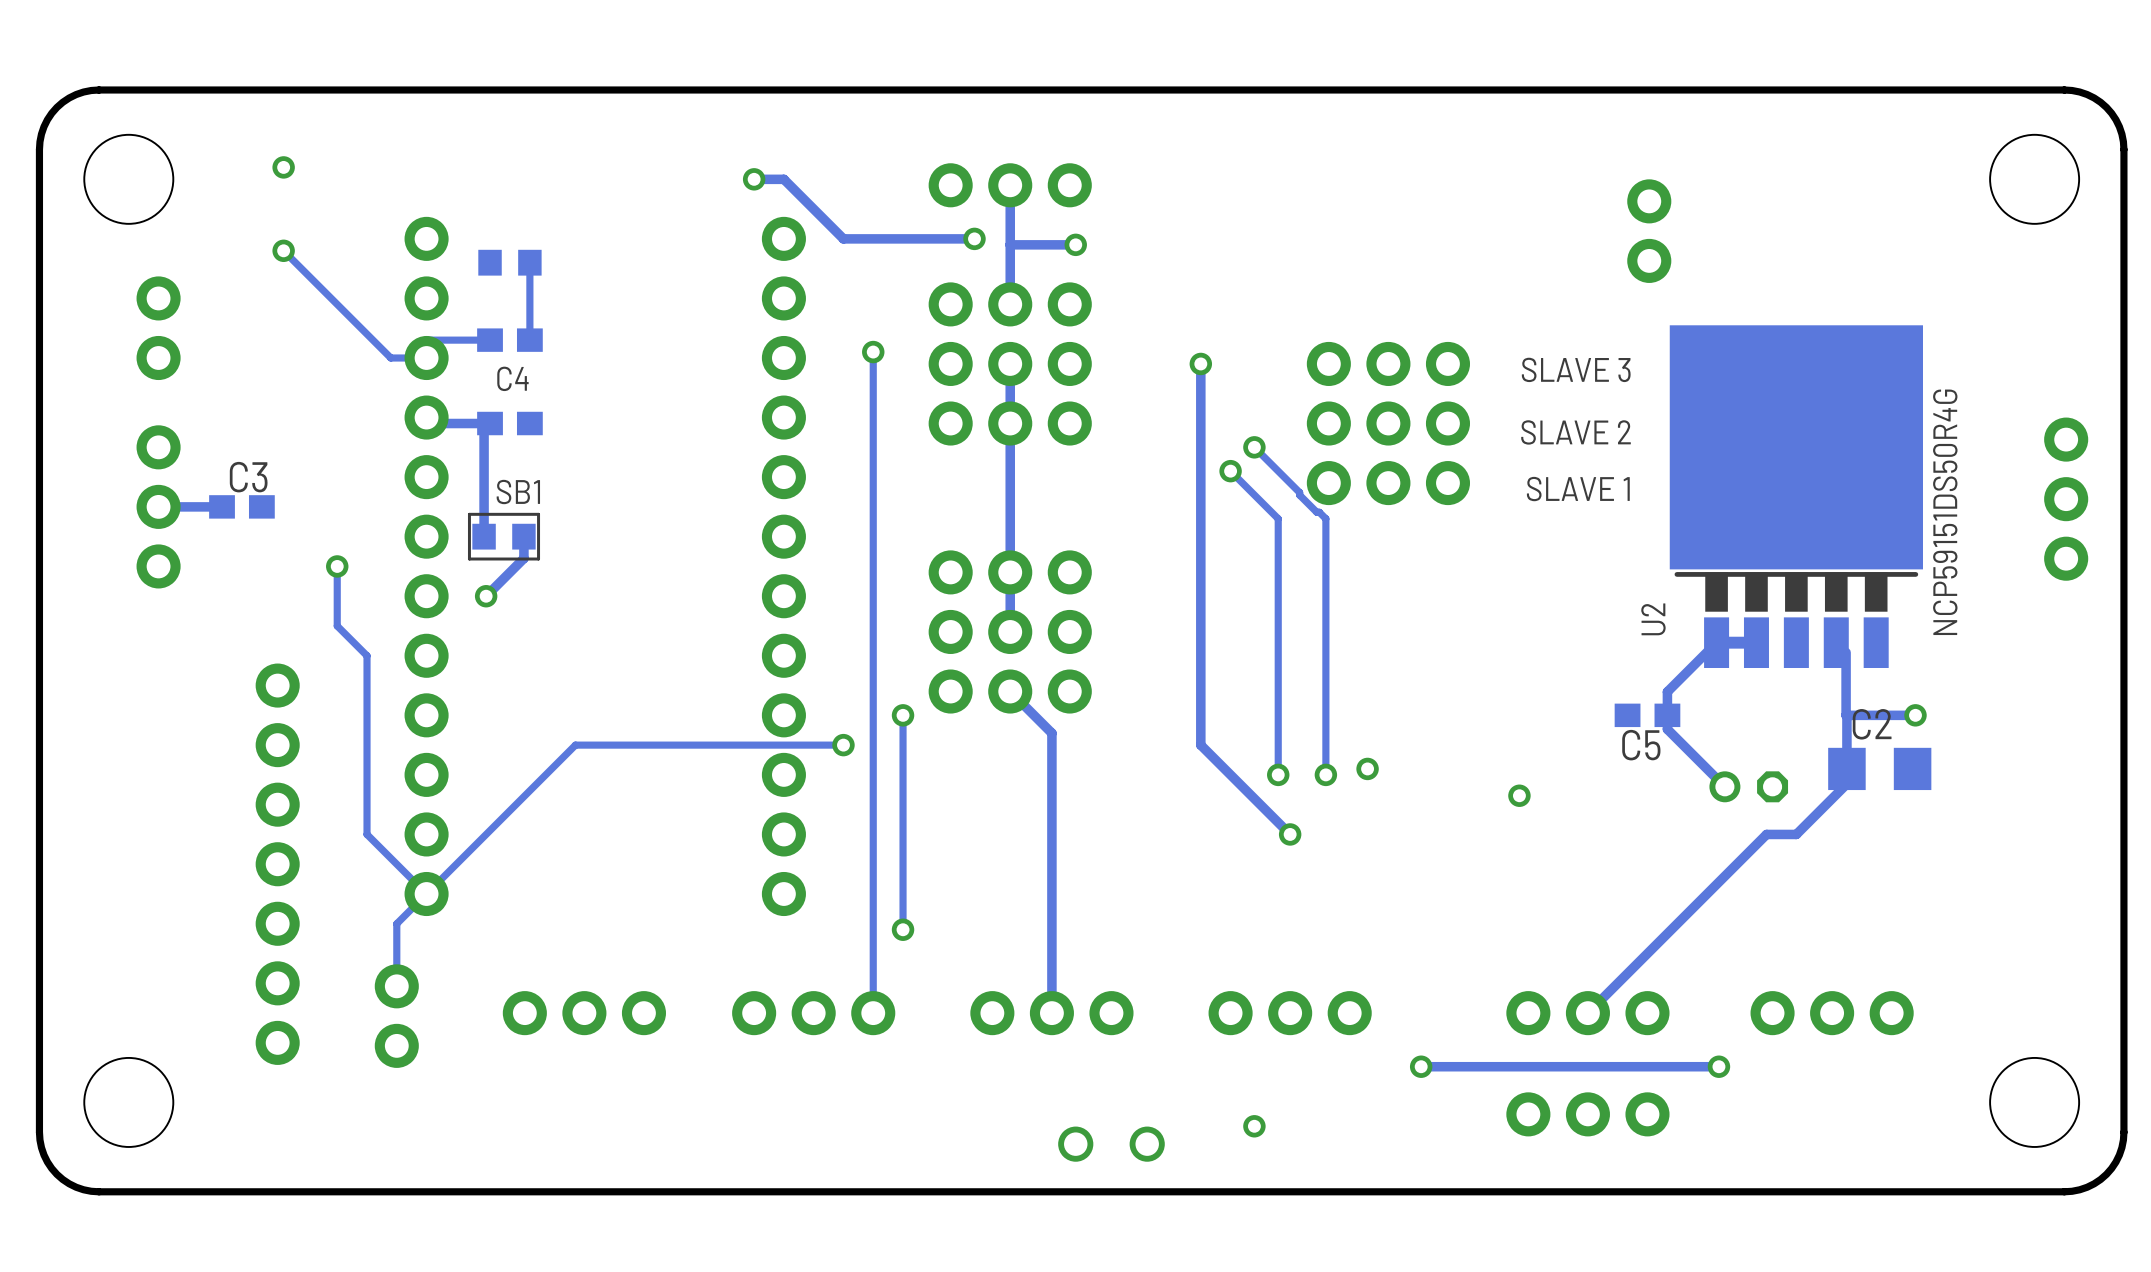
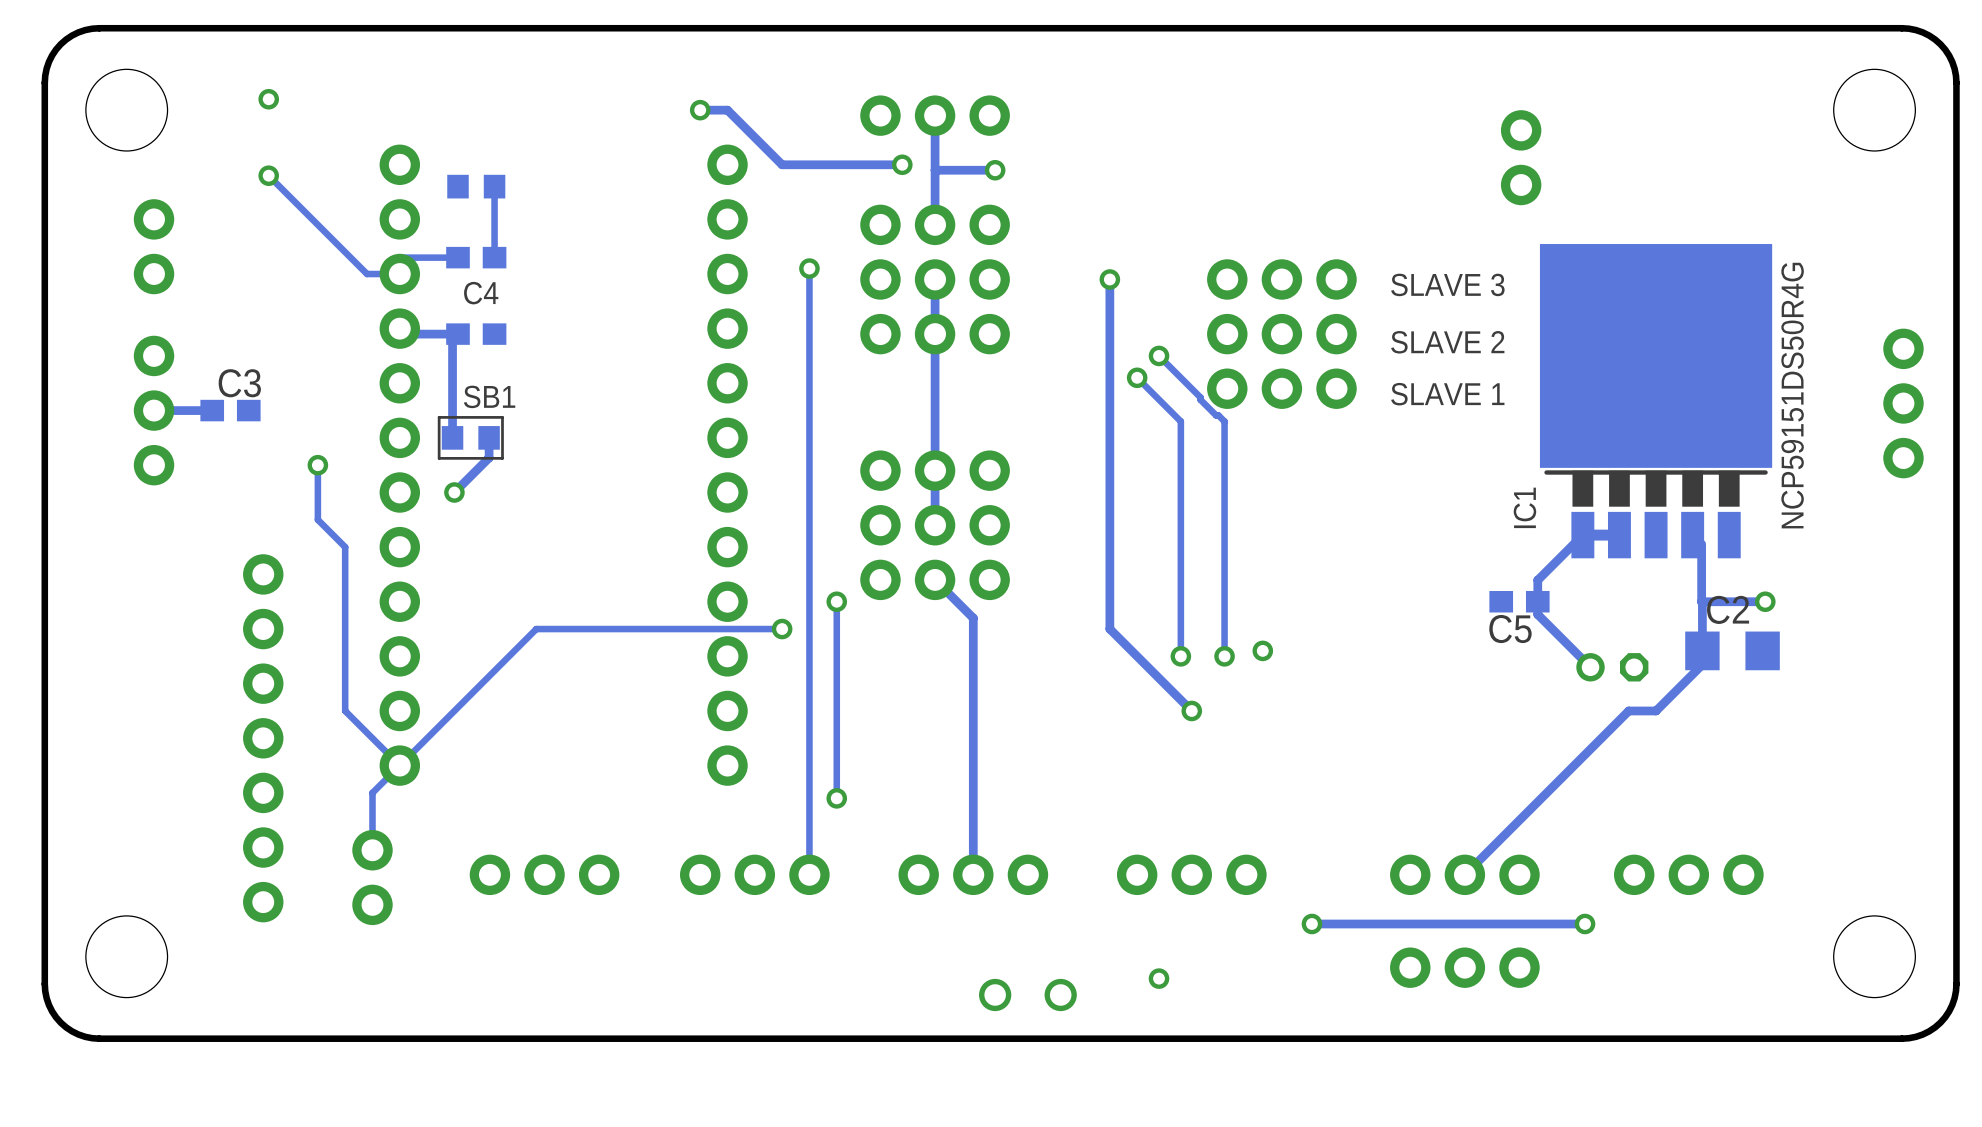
U2 name: U2 (1653, 619) -> IC1 (1524, 507)
via: (1519, 795) -> none

